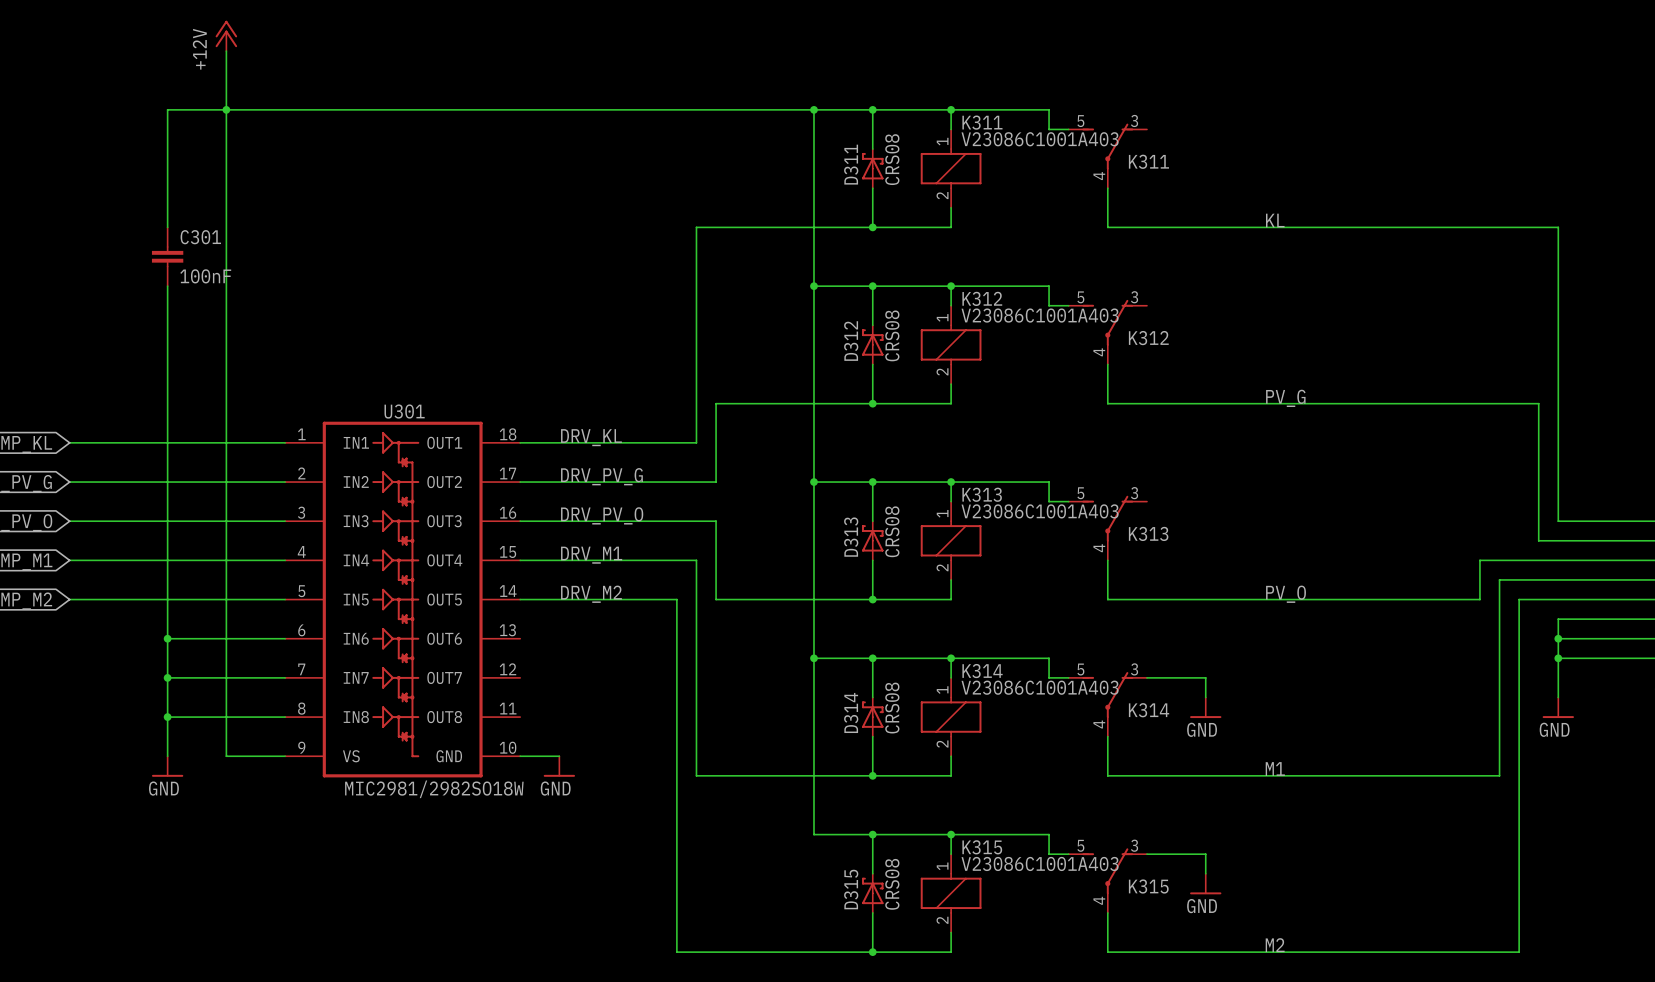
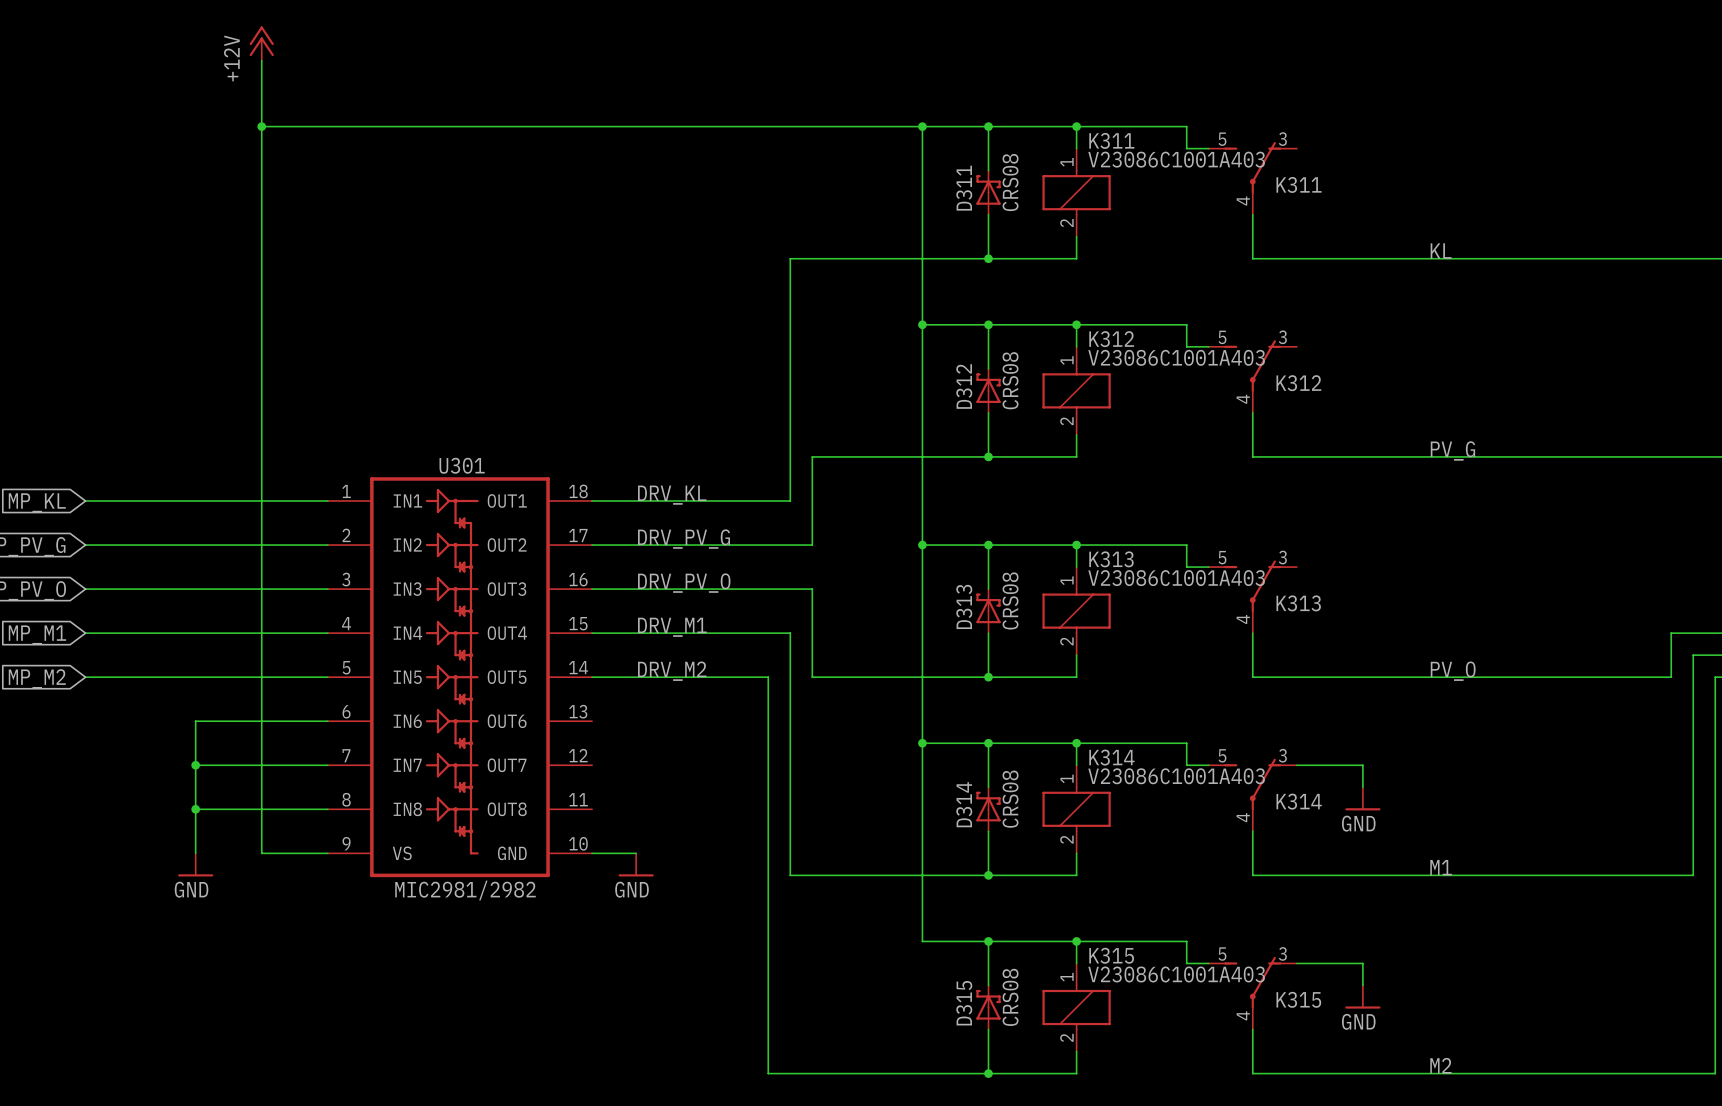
wire: (226, 109) (167, 109) (167, 227) -> none
C301: 100nF (167, 256) -> none
wire: (167, 286) (167, 638) -> none
junction: (167, 638) -> none
U301 value: MIC2981/2982SO18W (434, 789) -> MIC2981/2982 (465, 890)

